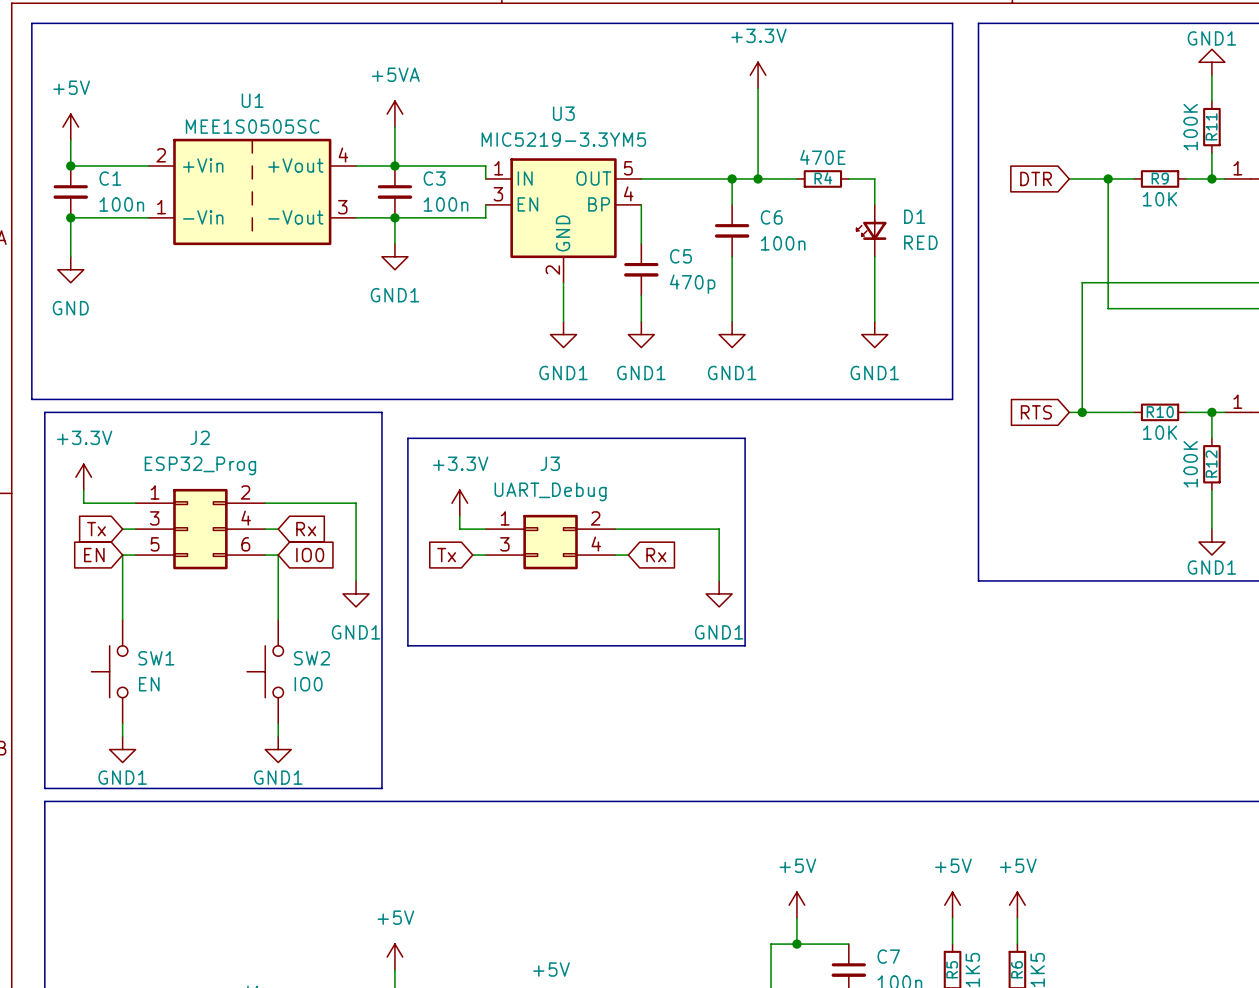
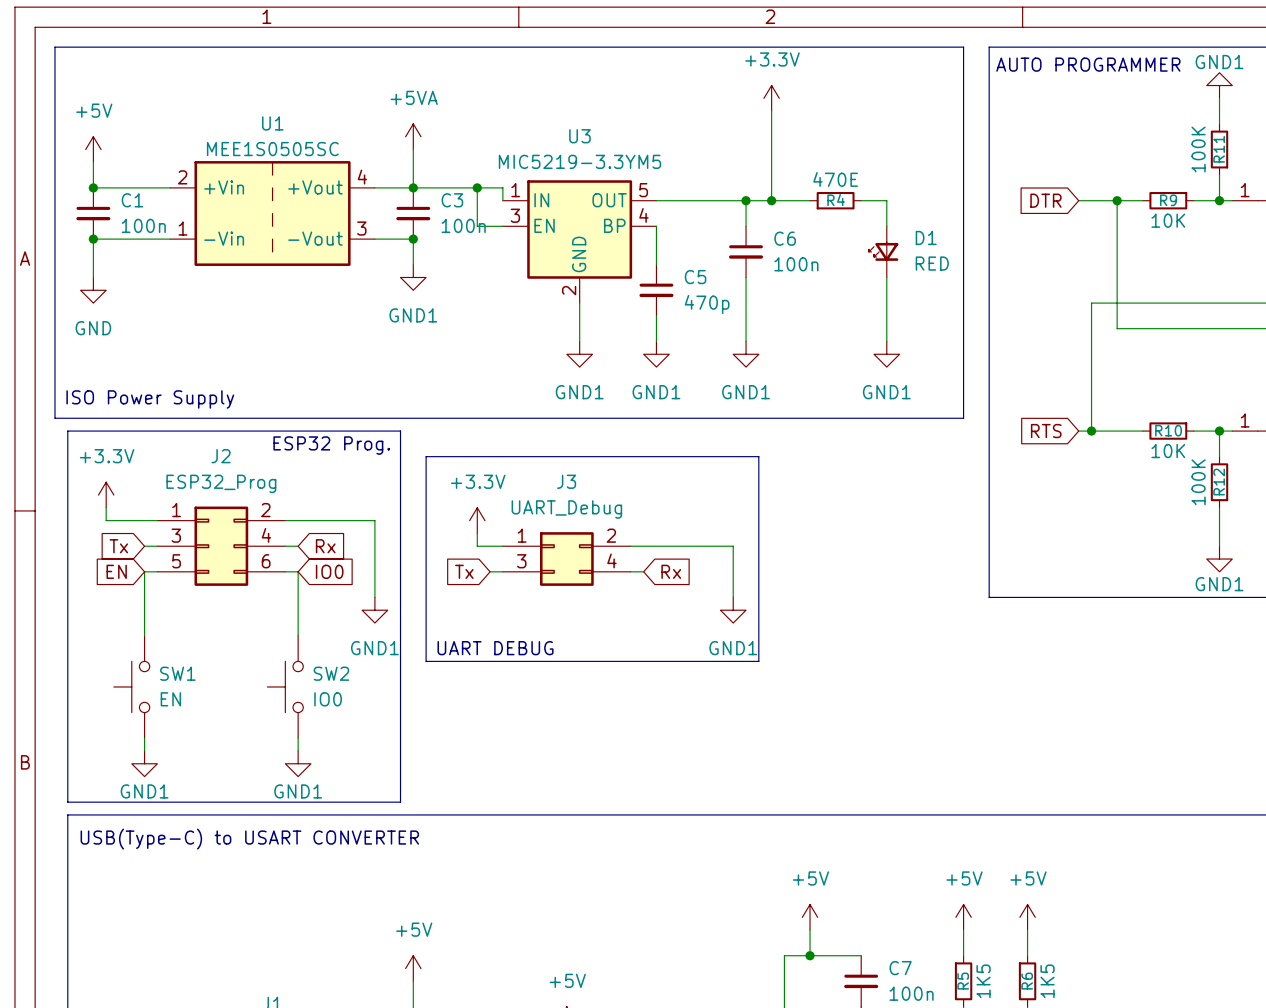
text: none -> AUTO PROGRAMMER (1088, 64)
junction: none -> (477, 187)
wire: (485, 204) (485, 217) (394, 217) -> (502, 226) (477, 226) (477, 187)
text: none -> ISO Power Supply (150, 399)
text: none -> ESP32 Prog. (331, 445)
text: none -> UART DEBUG (495, 648)
text: none -> USB(Type-C) to USART CONVERTER (249, 839)

